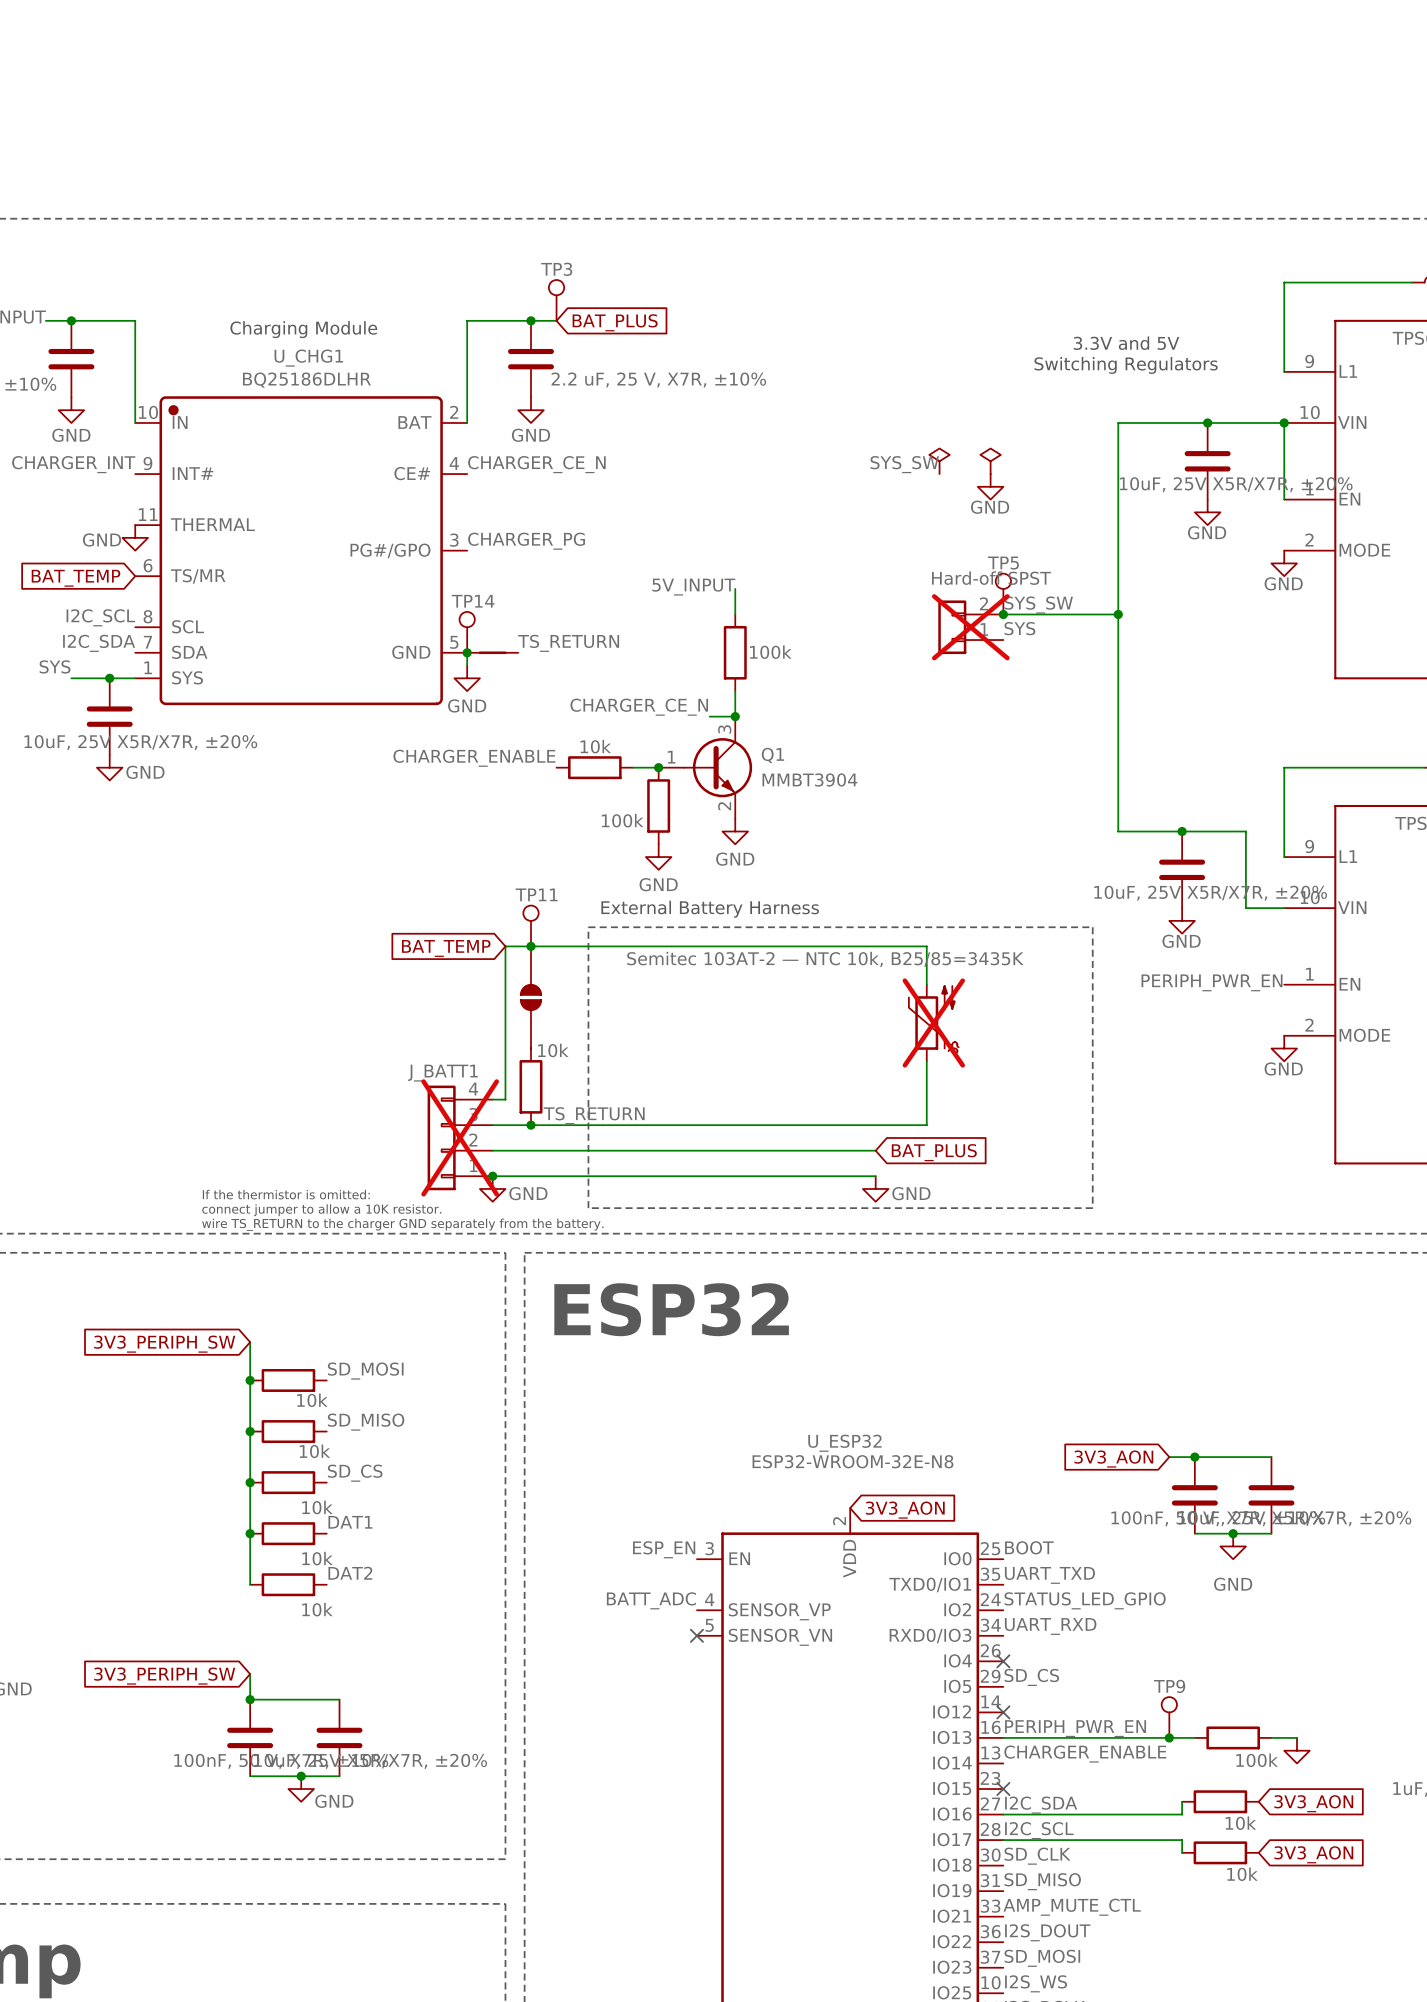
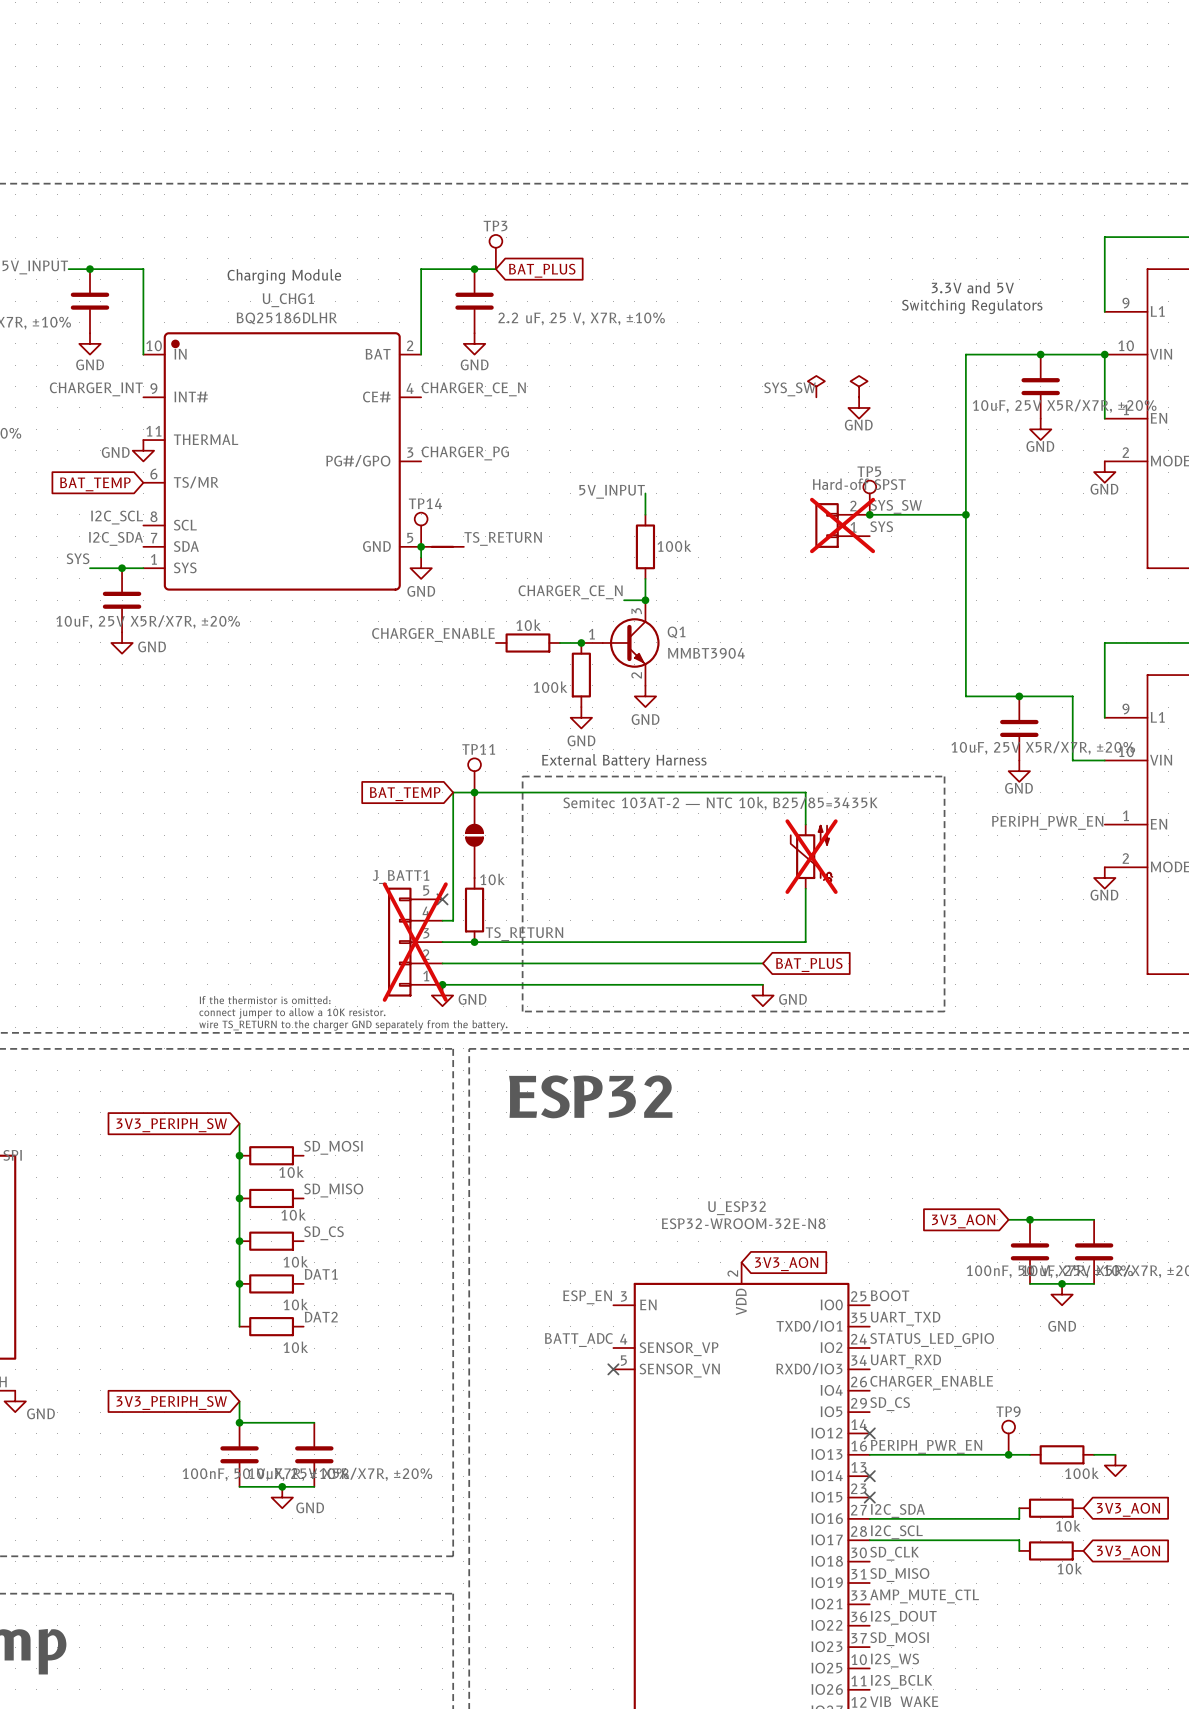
no-connect mark: none -> (442, 899)
J_BATT1 symbol: [427, 1085, 493, 1191] -> [388, 887, 443, 997]
no-connect mark: (1003, 1661) -> none
label position: CHARGER_ENABLE (1085, 1754) -> CHARGER_ENABLE (931, 1382)
no-connect mark: none -> (869, 1476)

